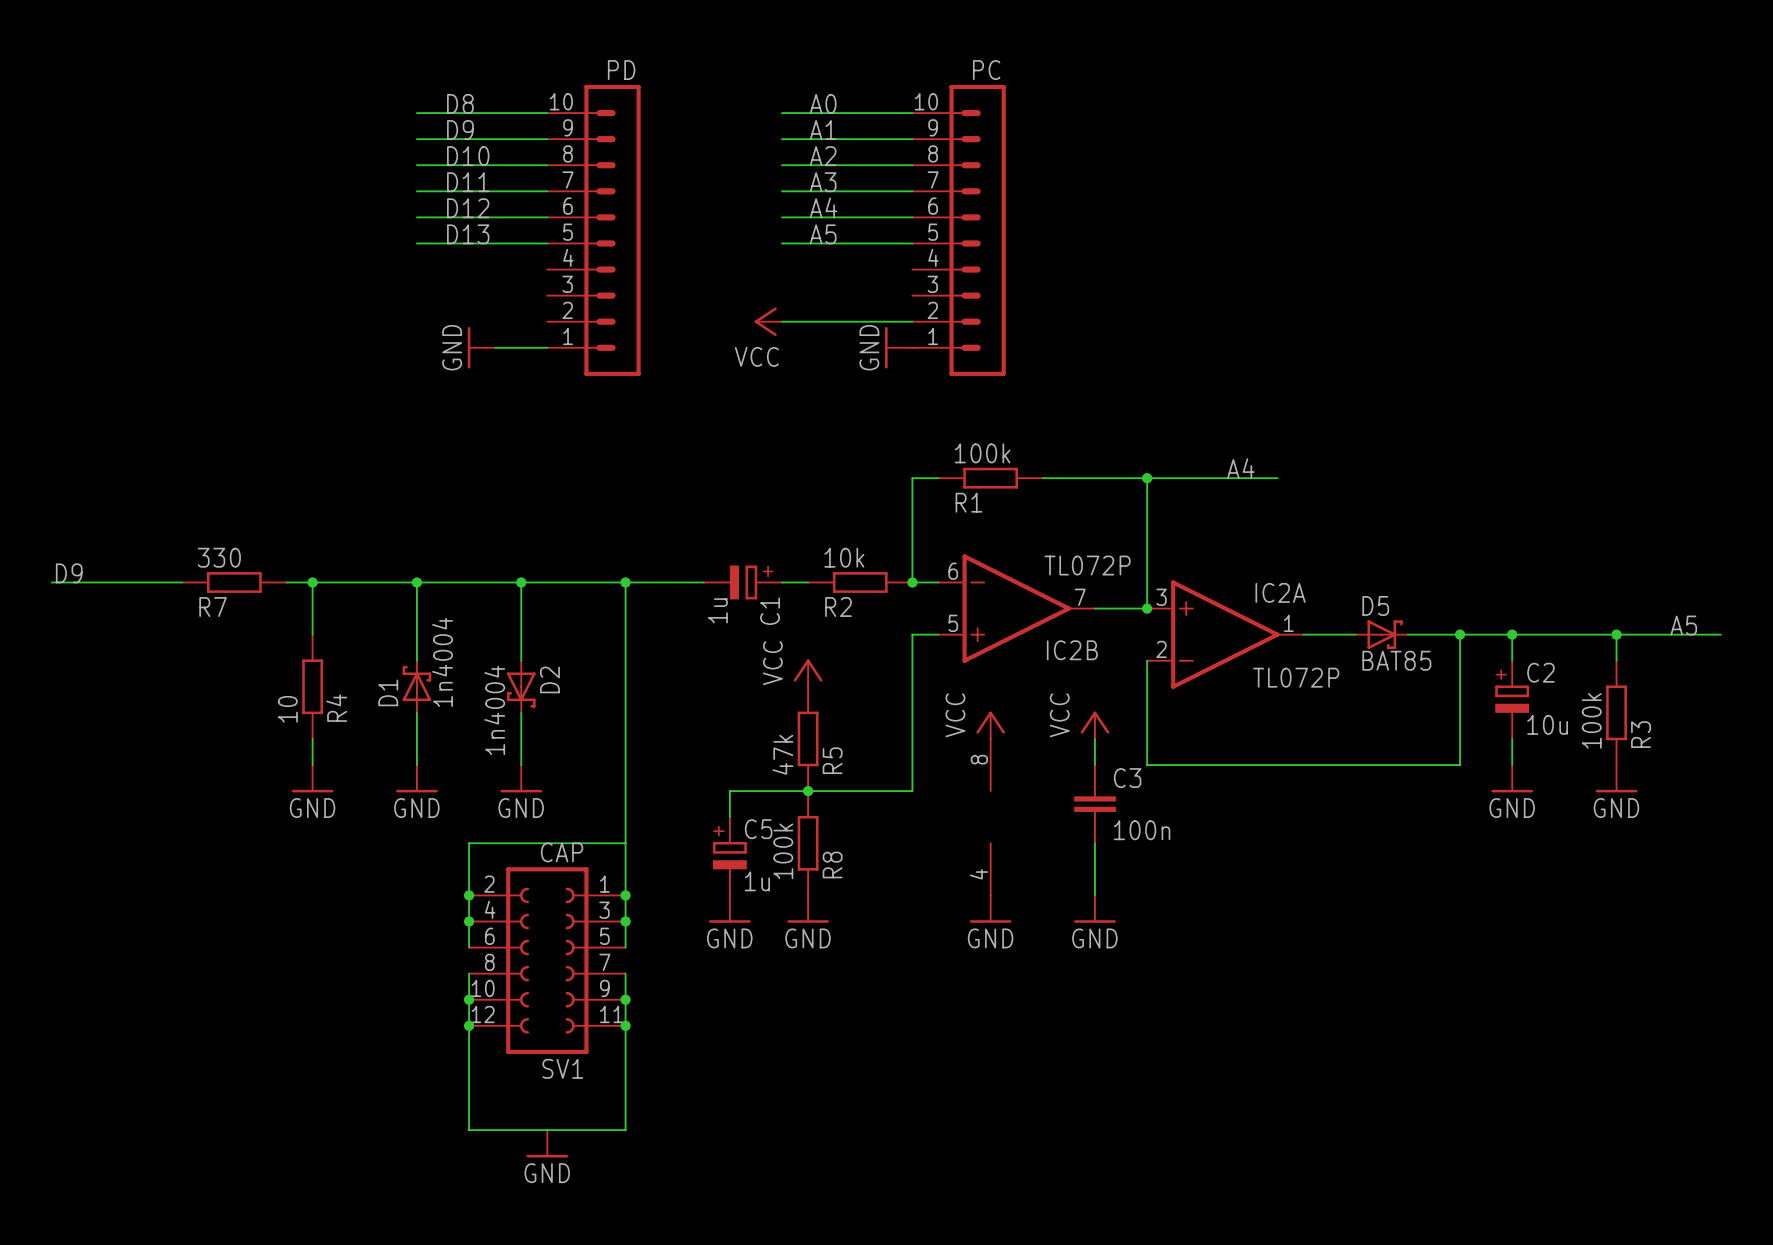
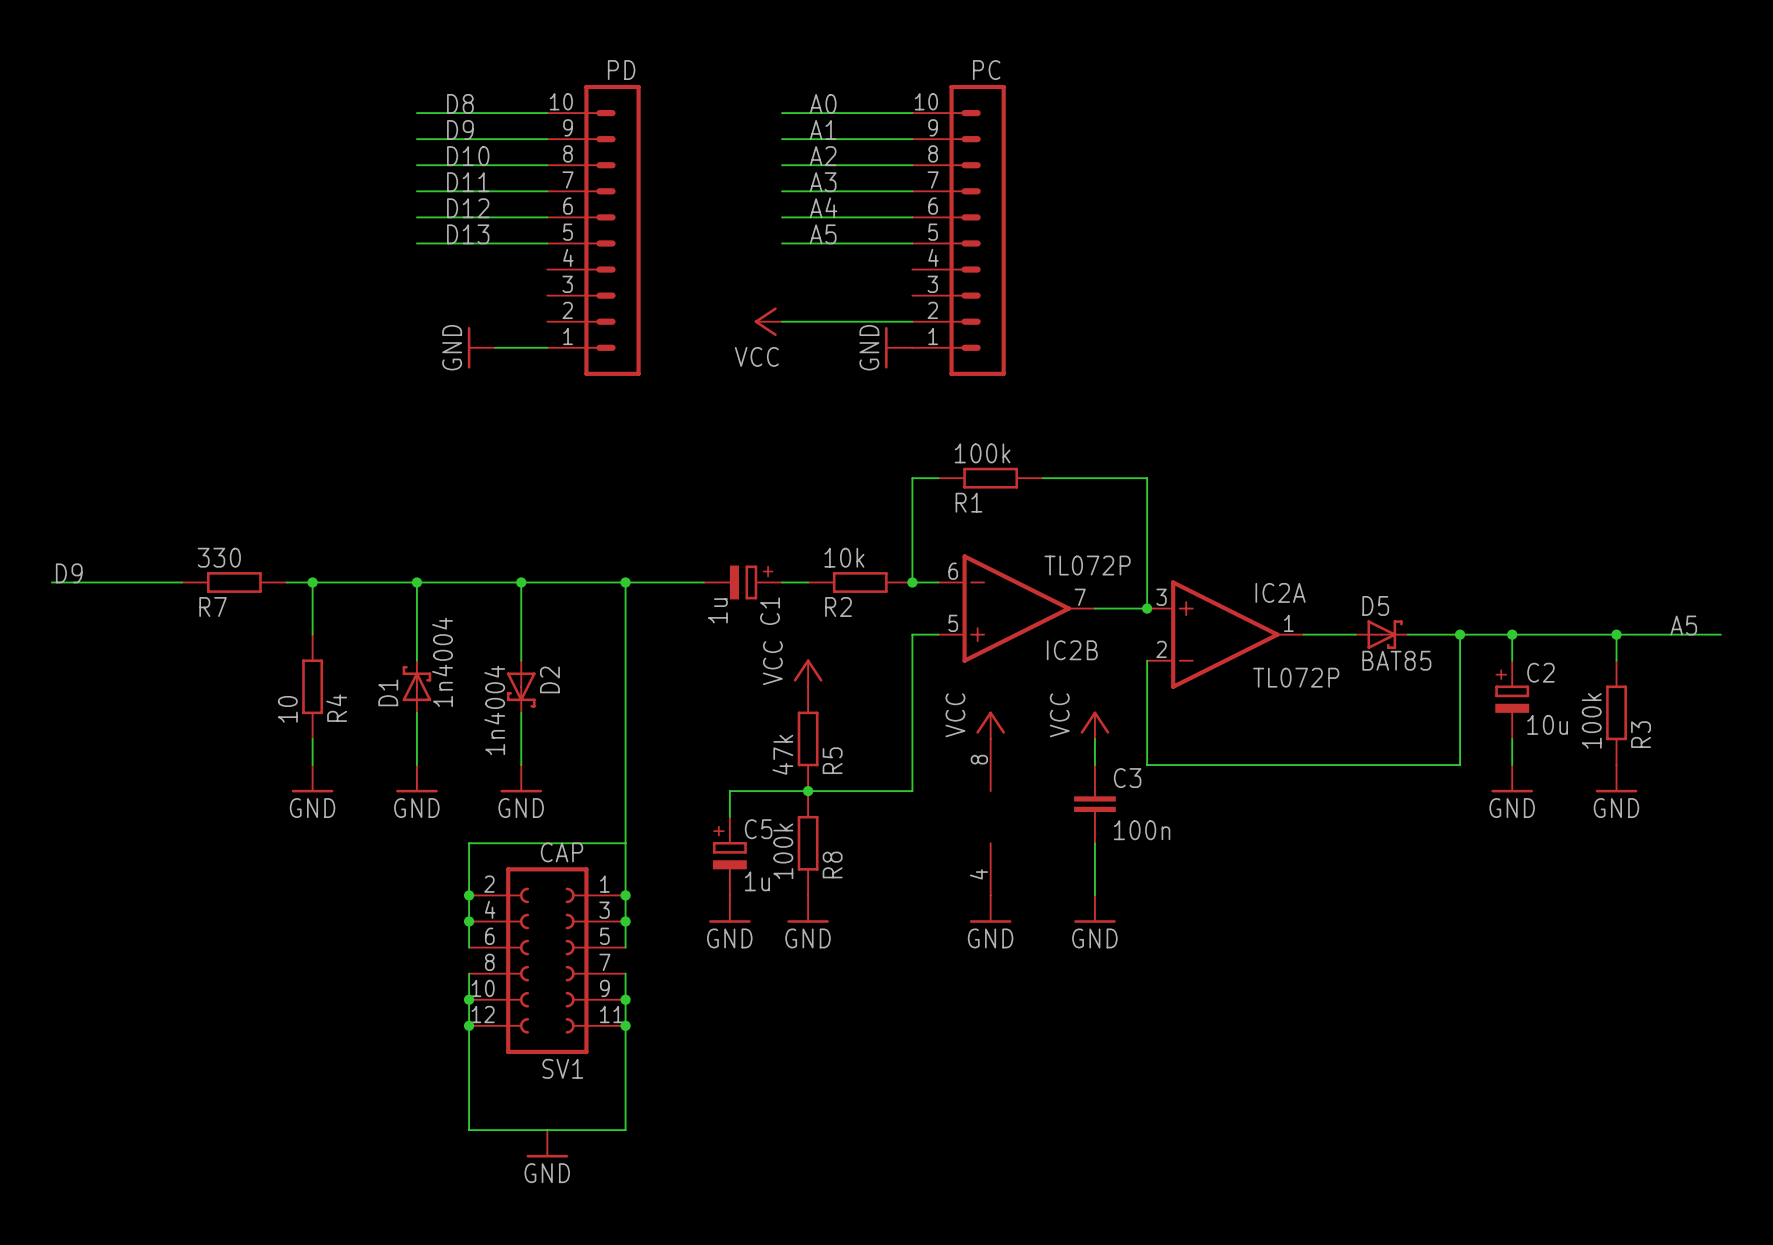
label: A4 (1240, 468) -> none
wire: (1147, 478) (1277, 478) -> none
junction: (1147, 478) -> none

